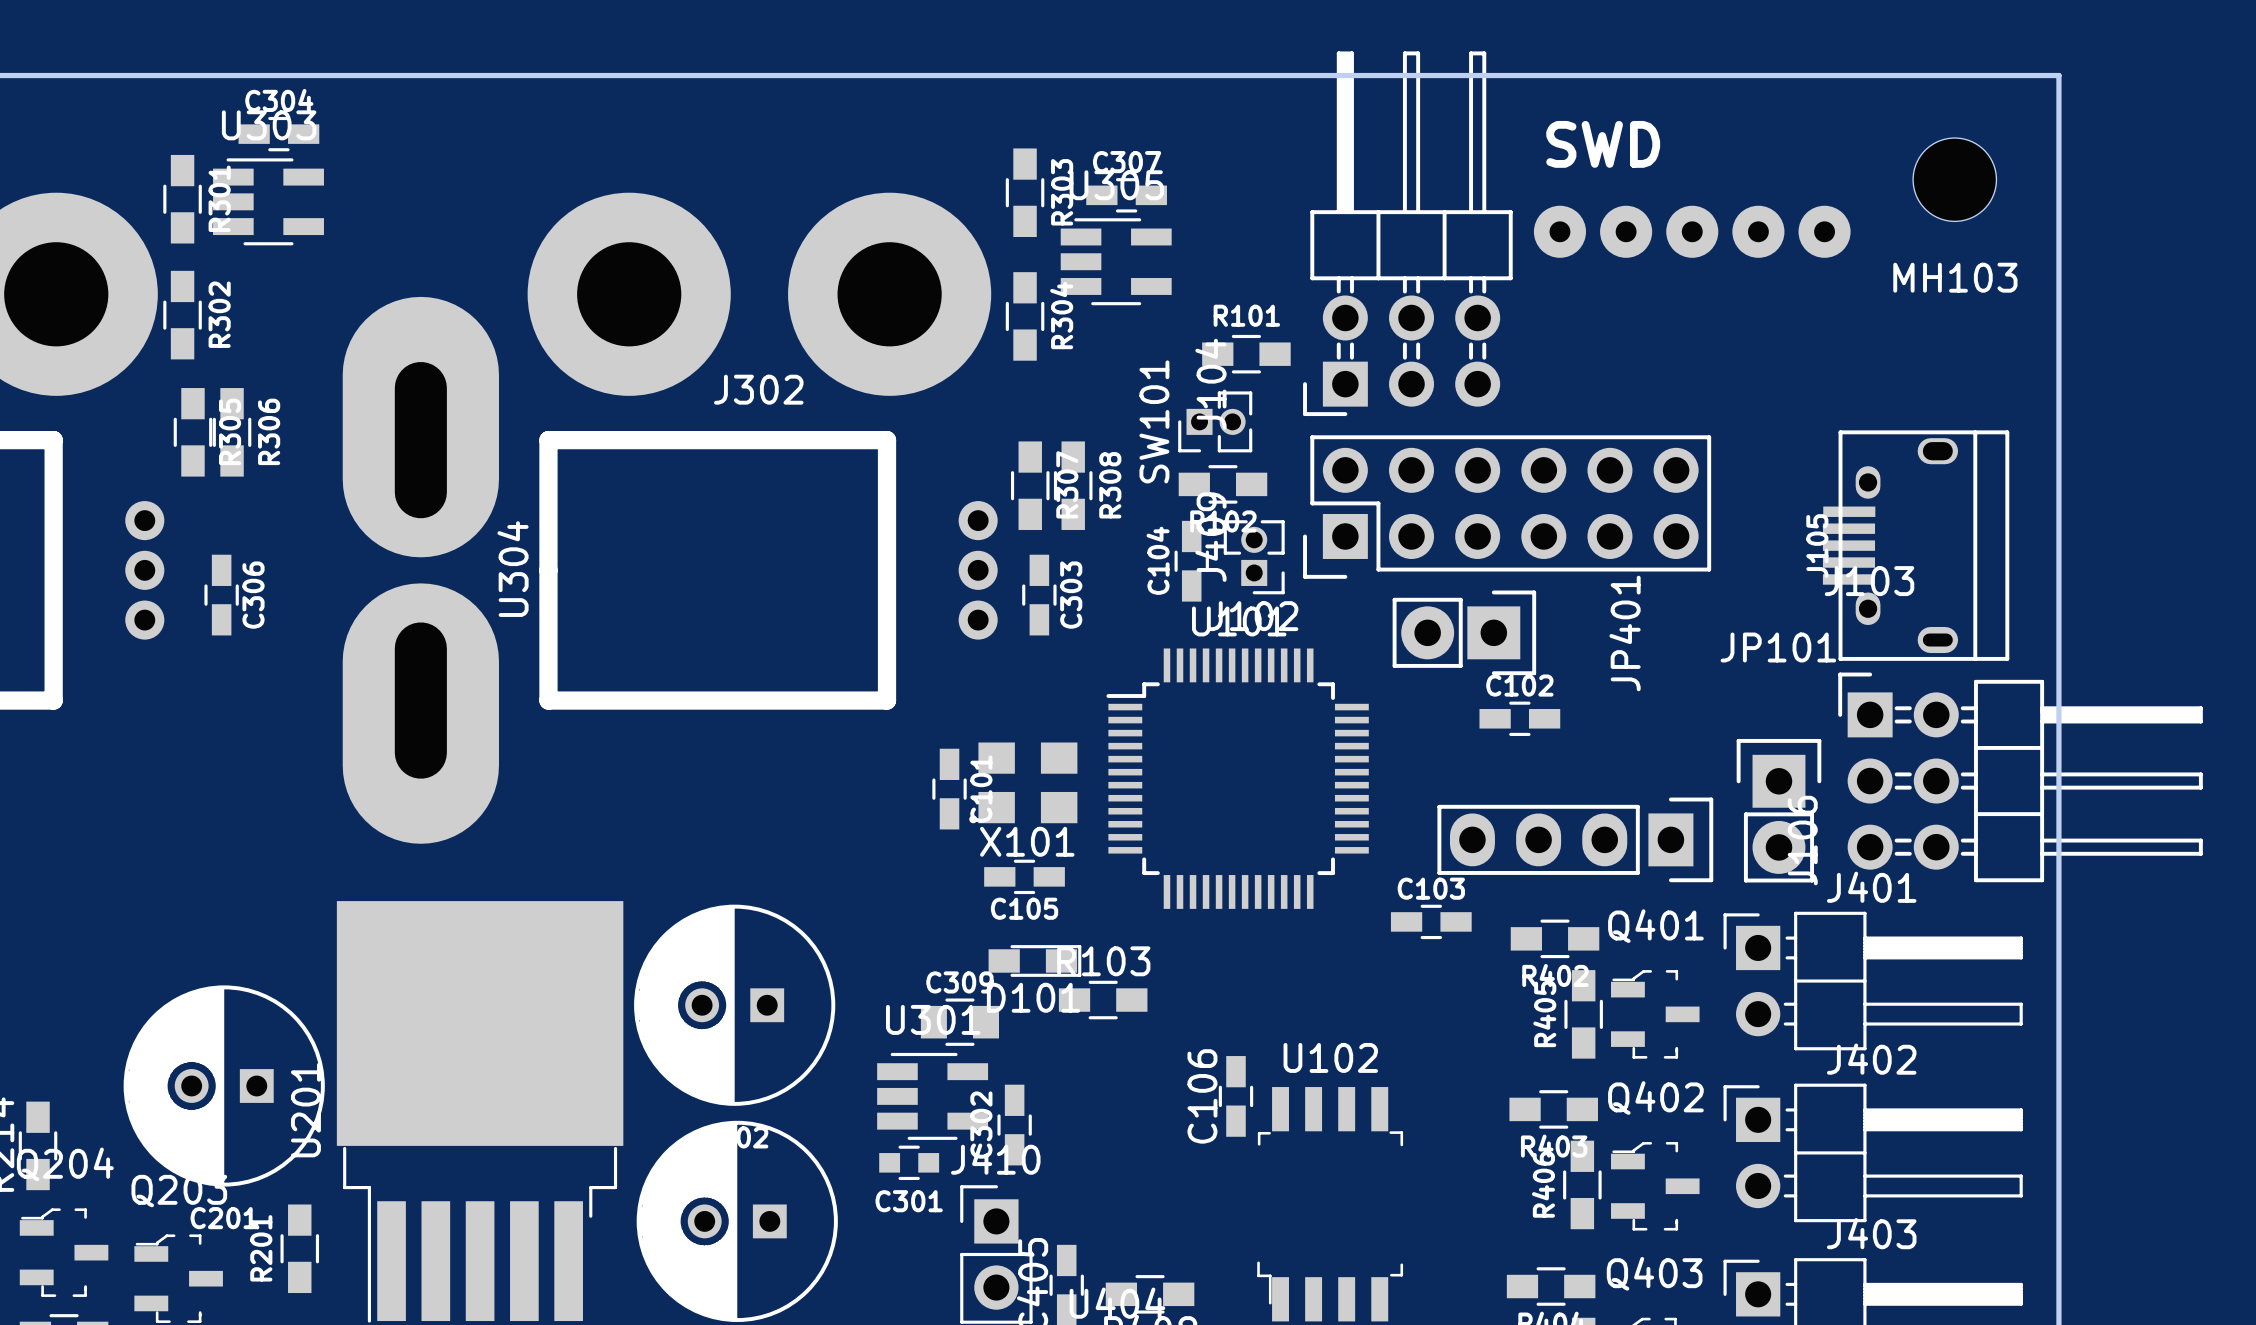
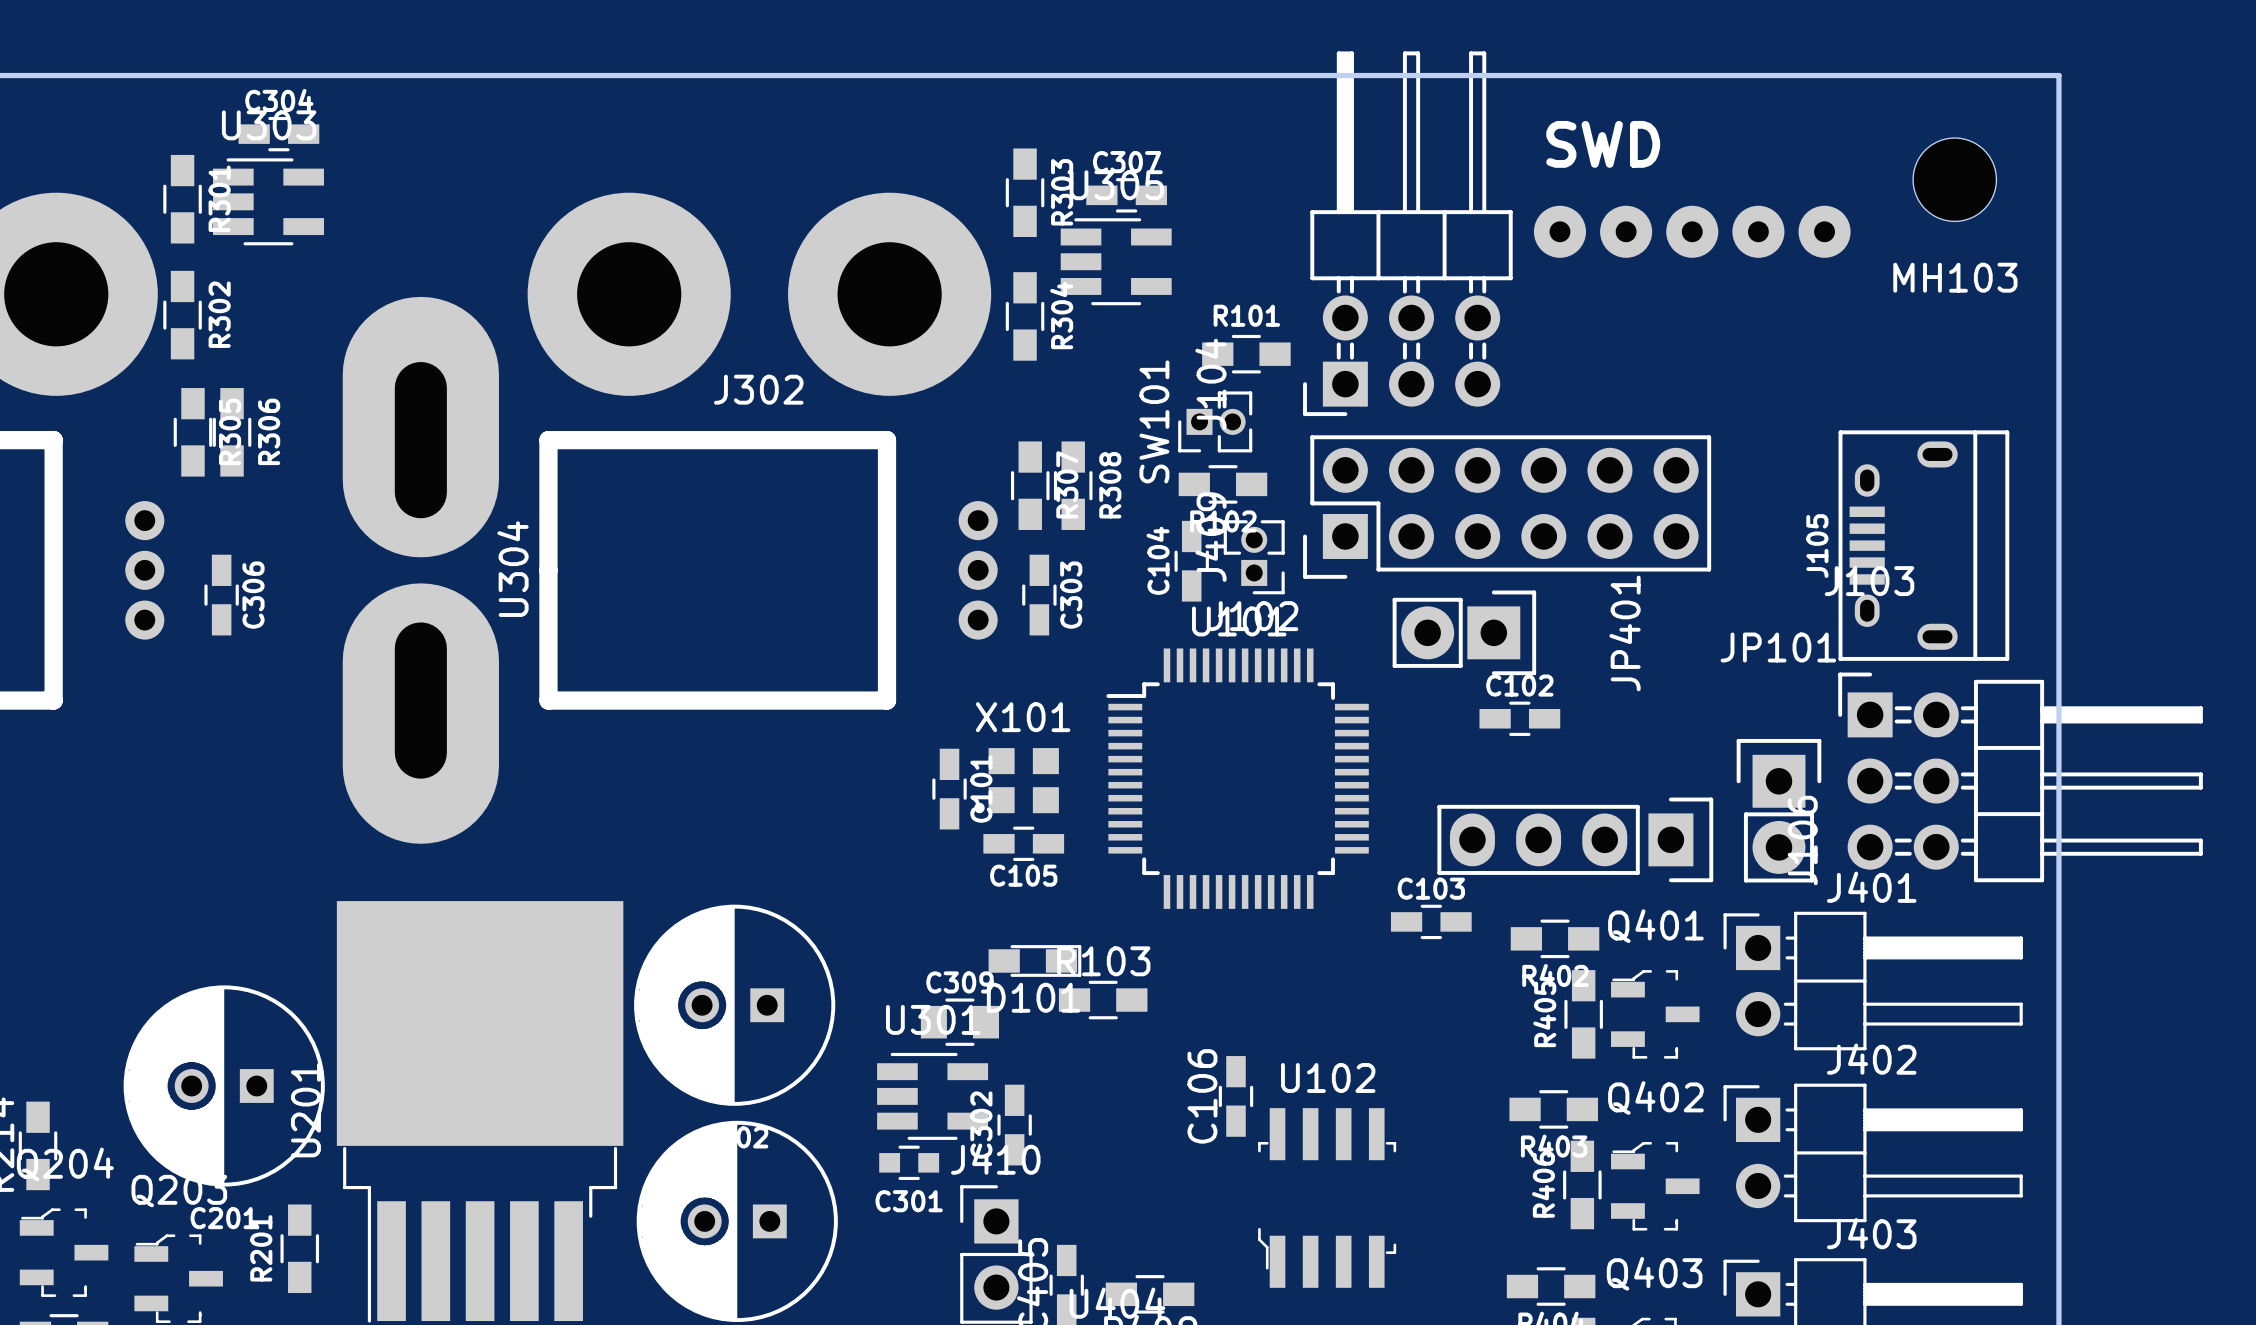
J105 footprint: [1822, 430, 2010, 661] -> [1838, 430, 2010, 661]
X101 footprint: [969, 742, 1078, 824] -> [974, 748, 1059, 814]
X101 name position: X101 (1027, 841) -> X101 (1023, 717)
C105 position: (1024, 876) -> (1023, 843)
U102 footprint: [1257, 1087, 1404, 1322] -> [1258, 1108, 1397, 1288]

